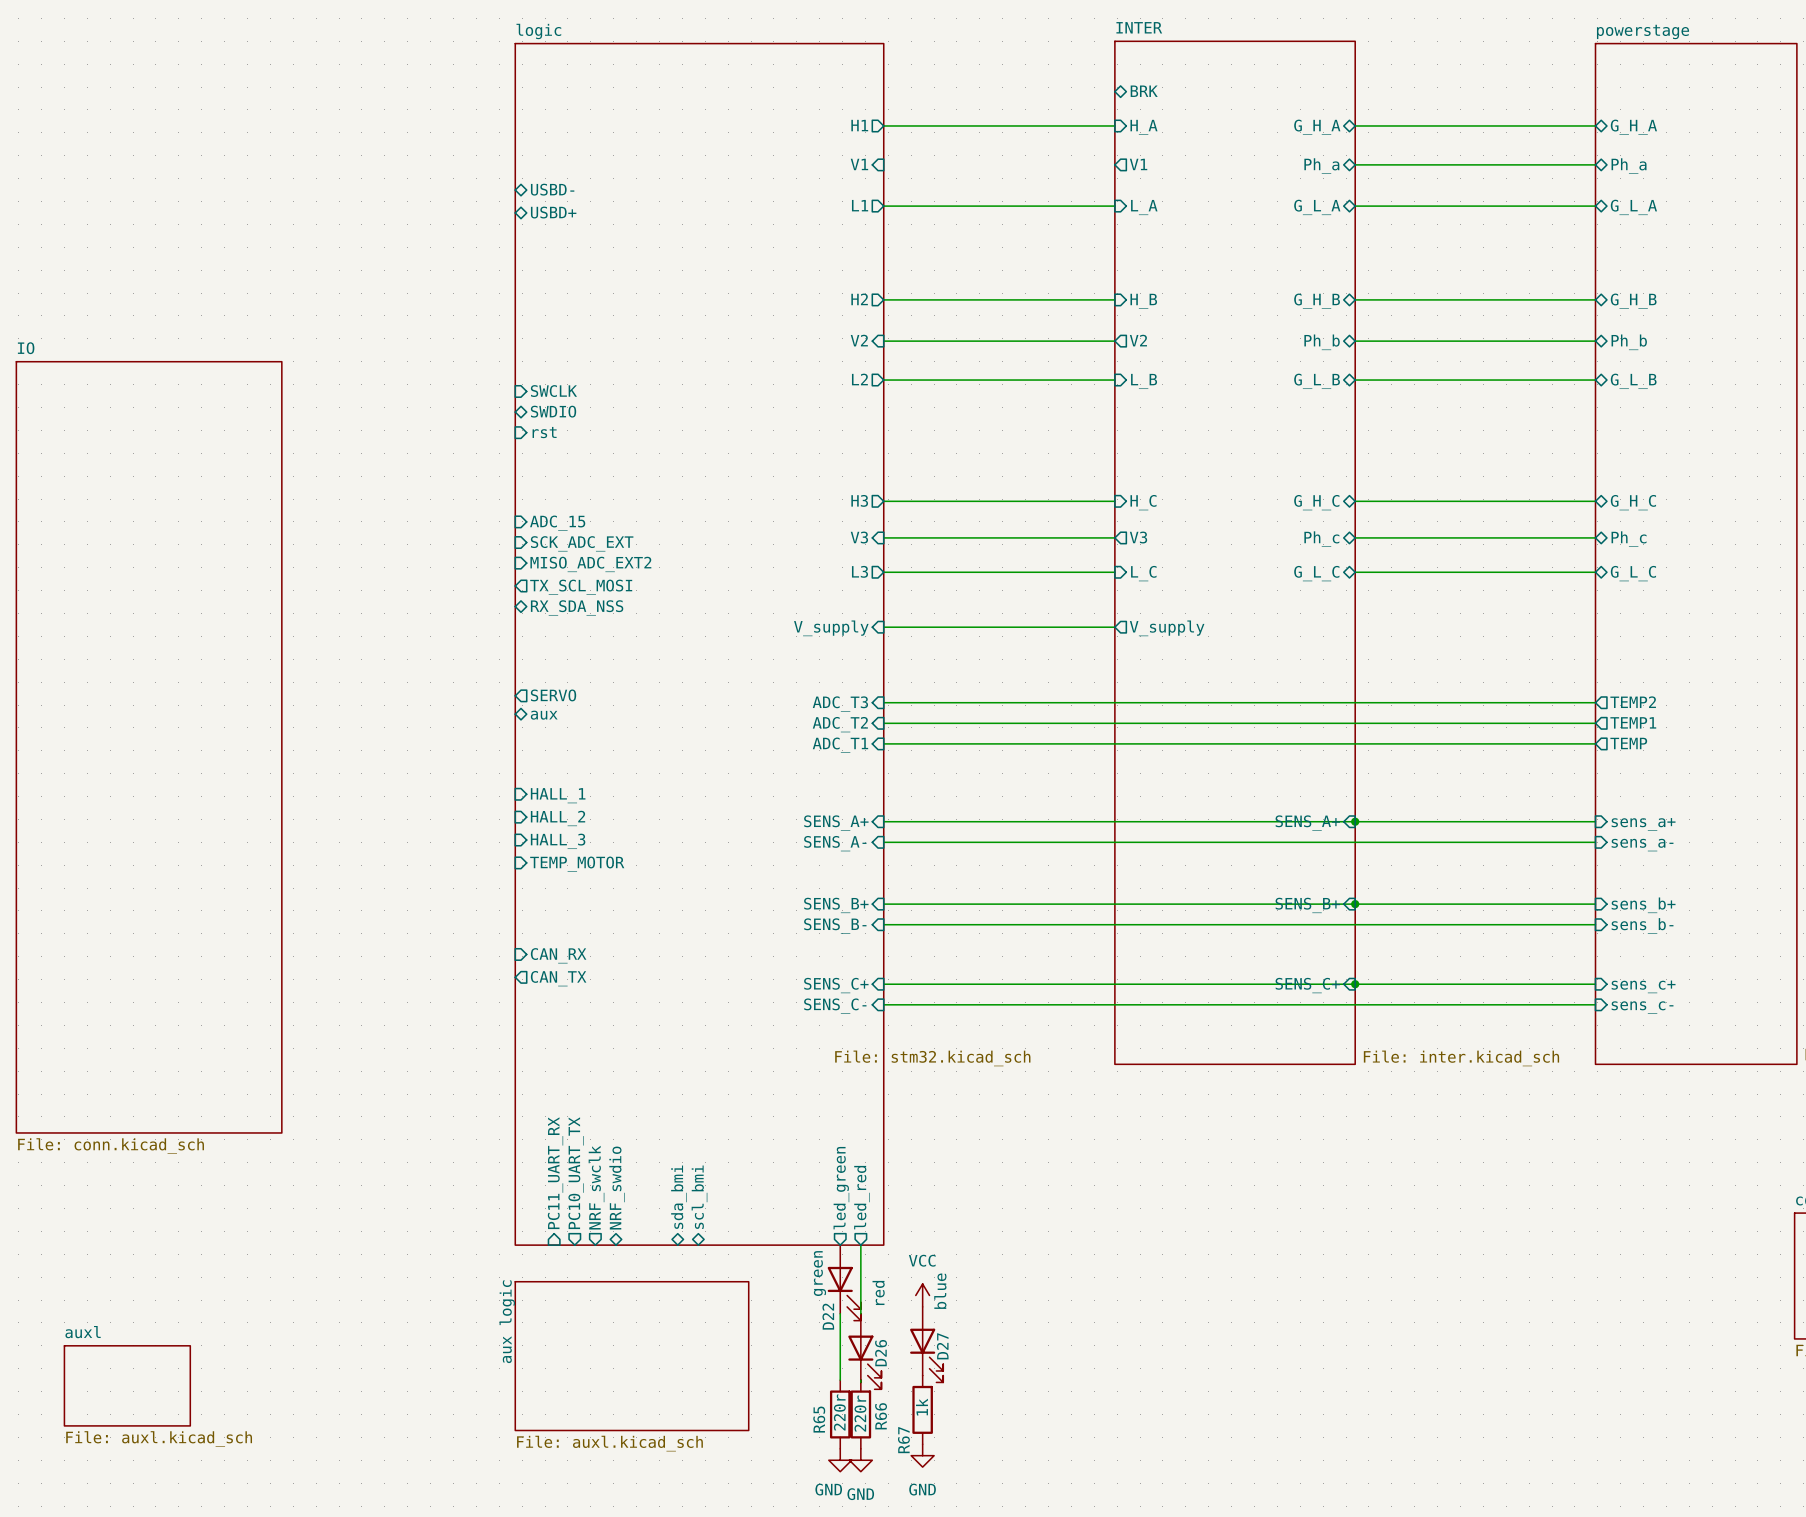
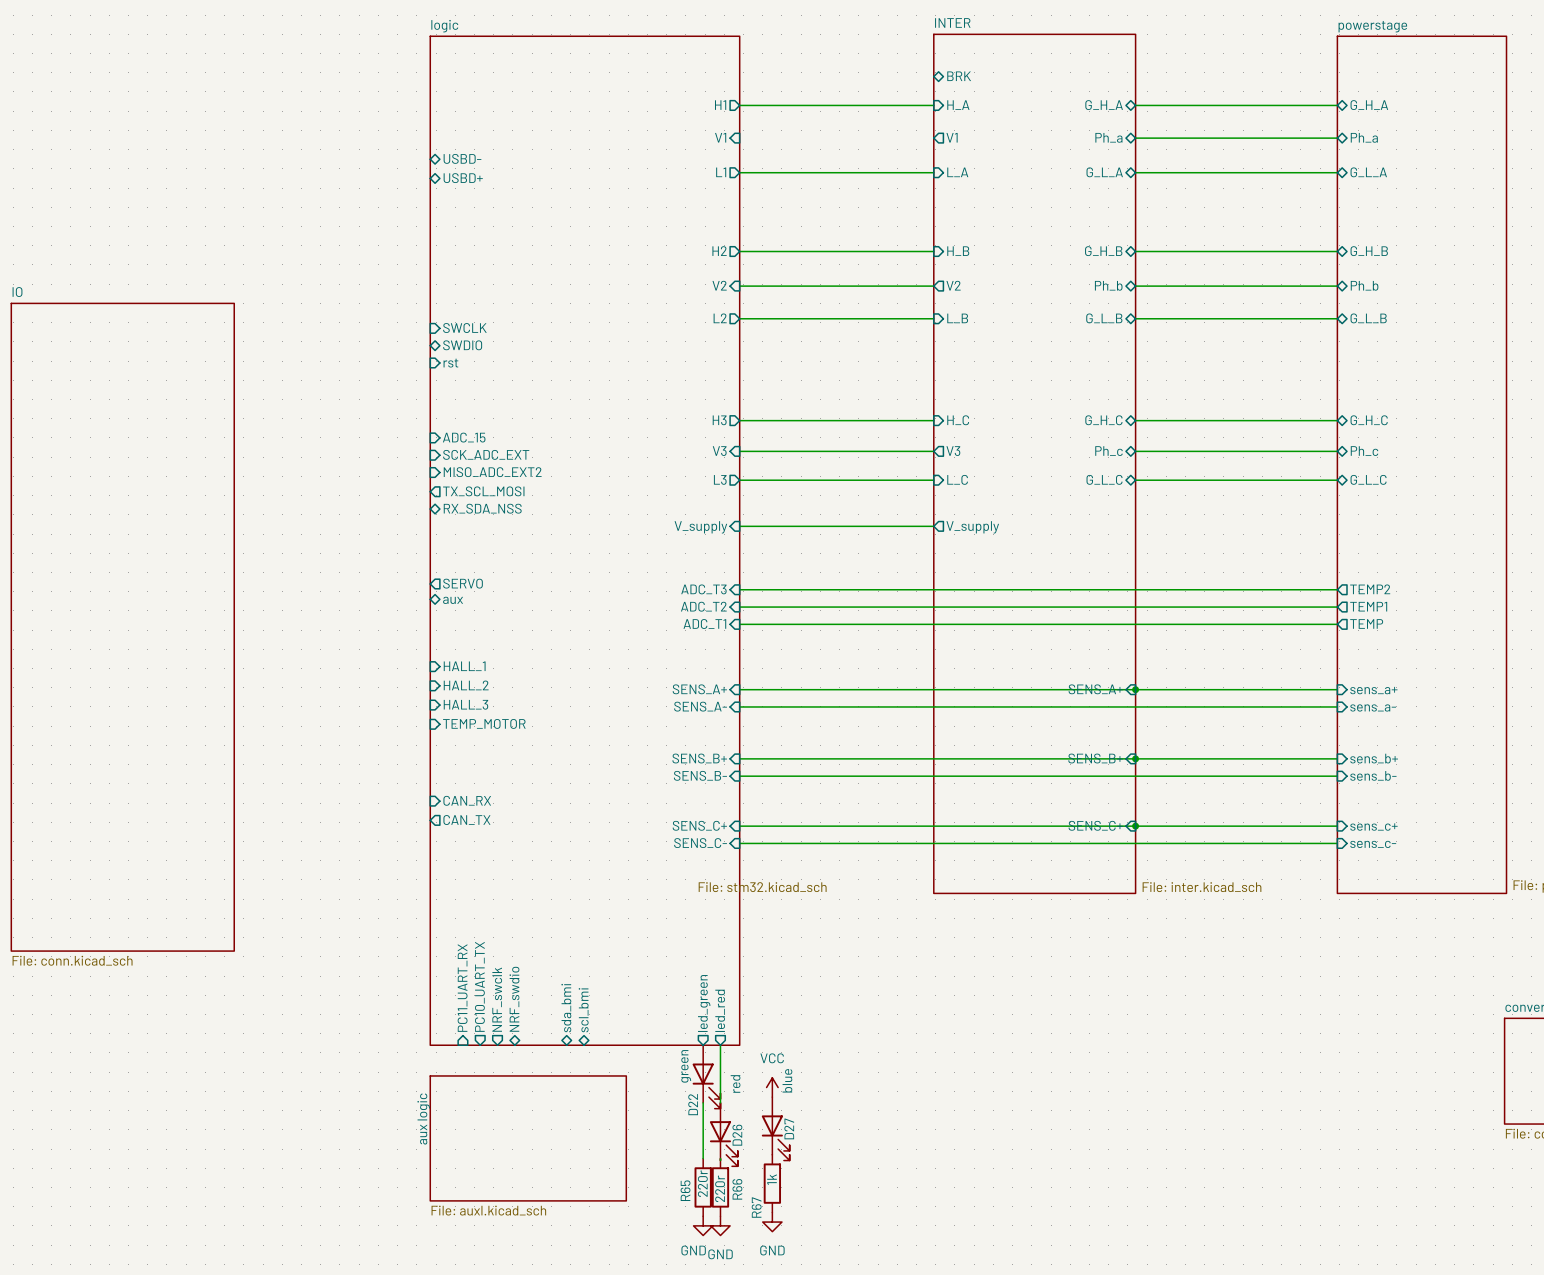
sheet auxl: File: auxl.kicad_sch (127, 1385) -> none

